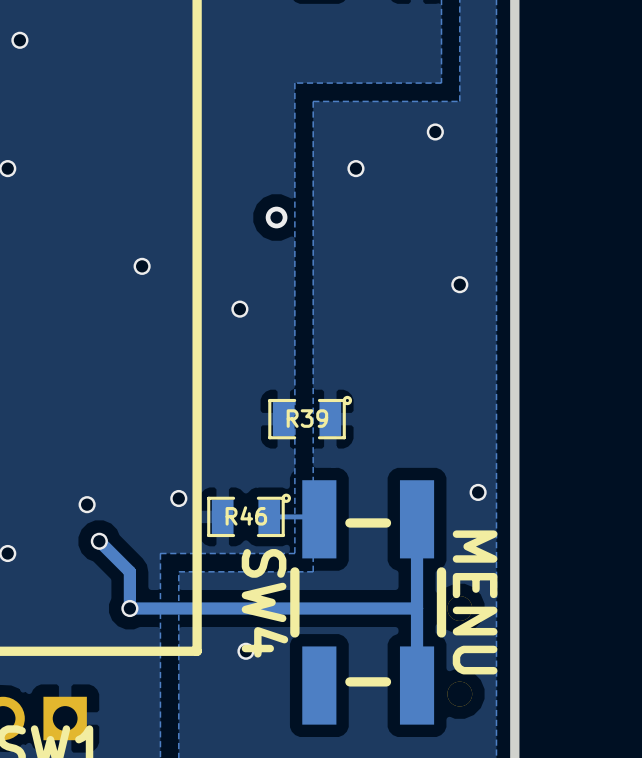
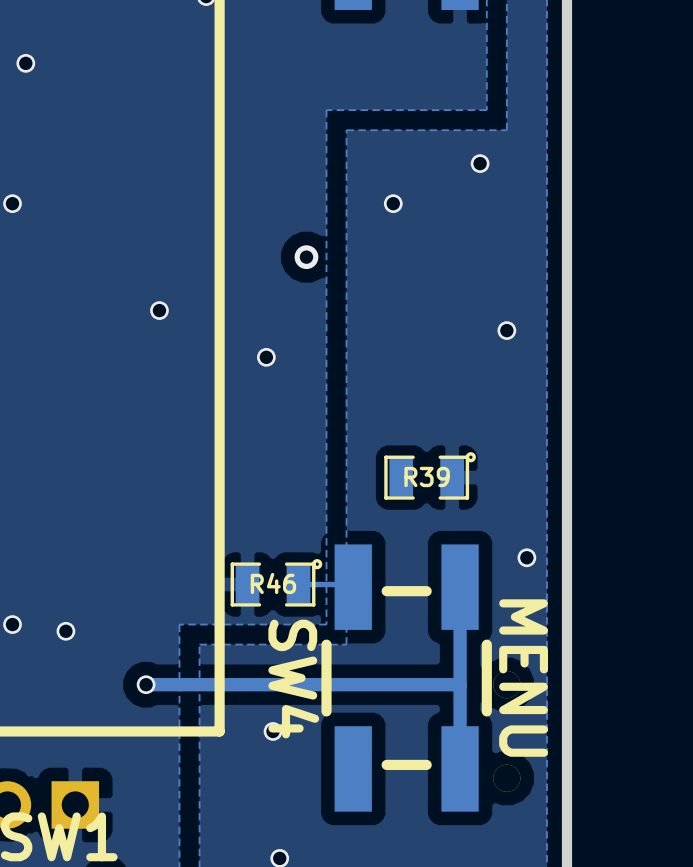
R39 position: (310, 417) -> (430, 475)
via: (178, 498) -> none
via: (87, 504) -> none
track: (99, 541) (129, 571) (129, 608) -> none
via: (99, 541) -> none
via: none -> (65, 631)

